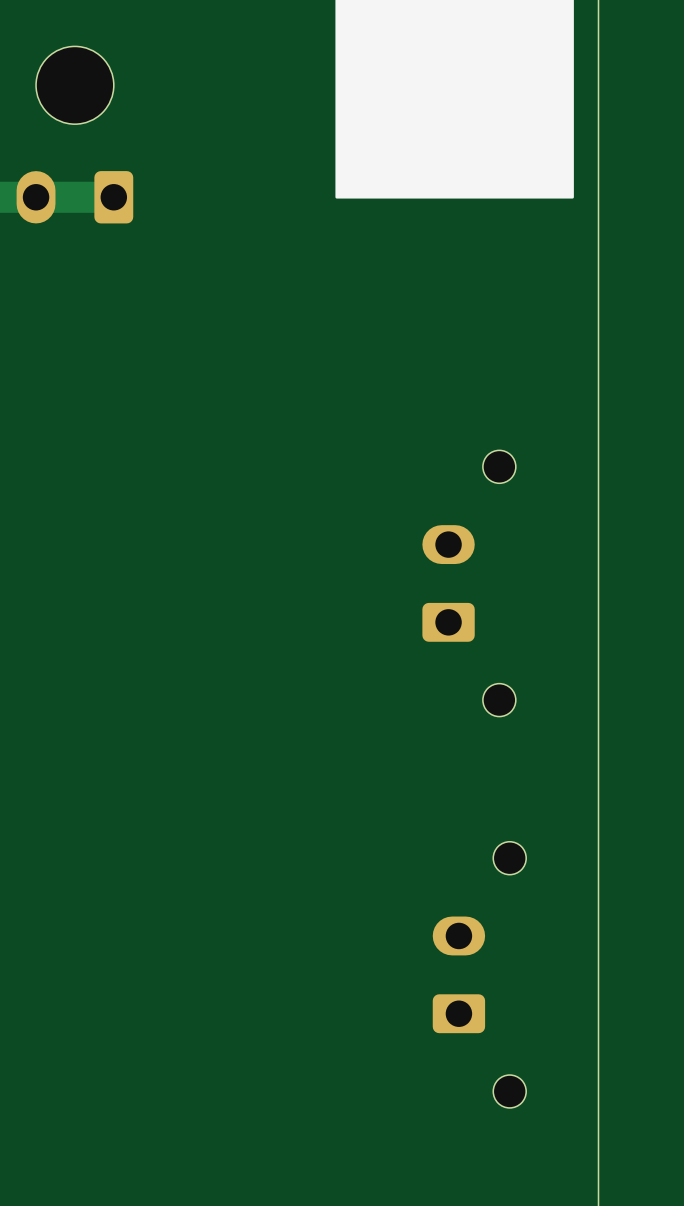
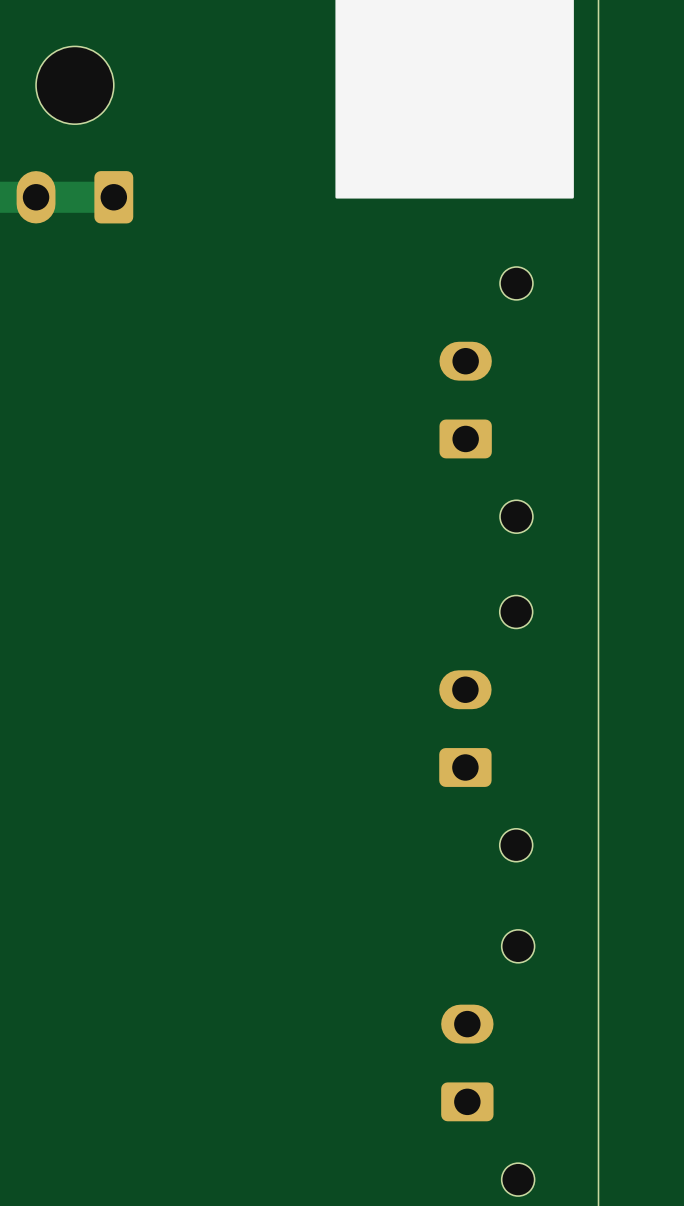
part: none -> (486, 400)
part: (469, 583) -> none
part: none -> (485, 728)
part position: (479, 974) -> (487, 1062)

